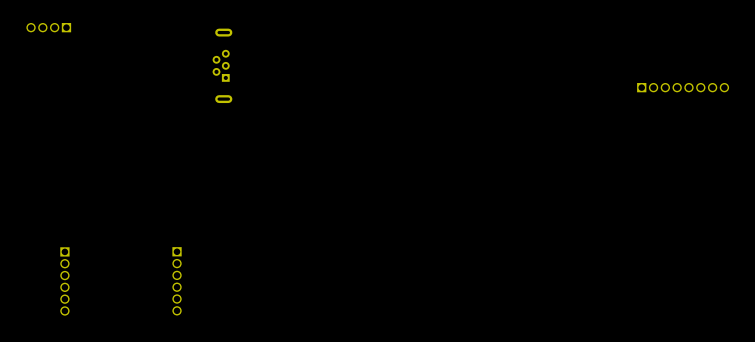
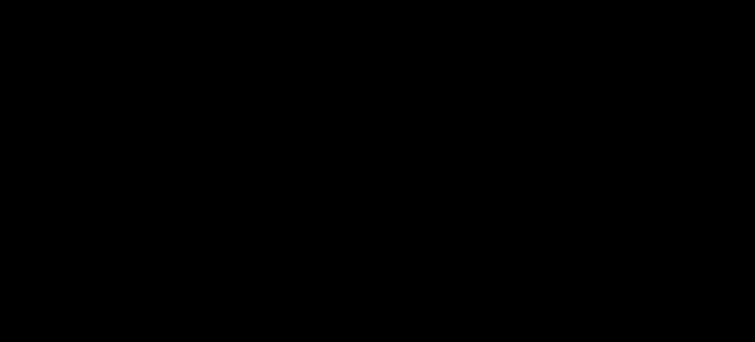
part: (48, 27) -> none
part: (222, 65) -> none
part: (683, 87) -> none
part: (64, 281) -> none
part: (177, 281) -> none

